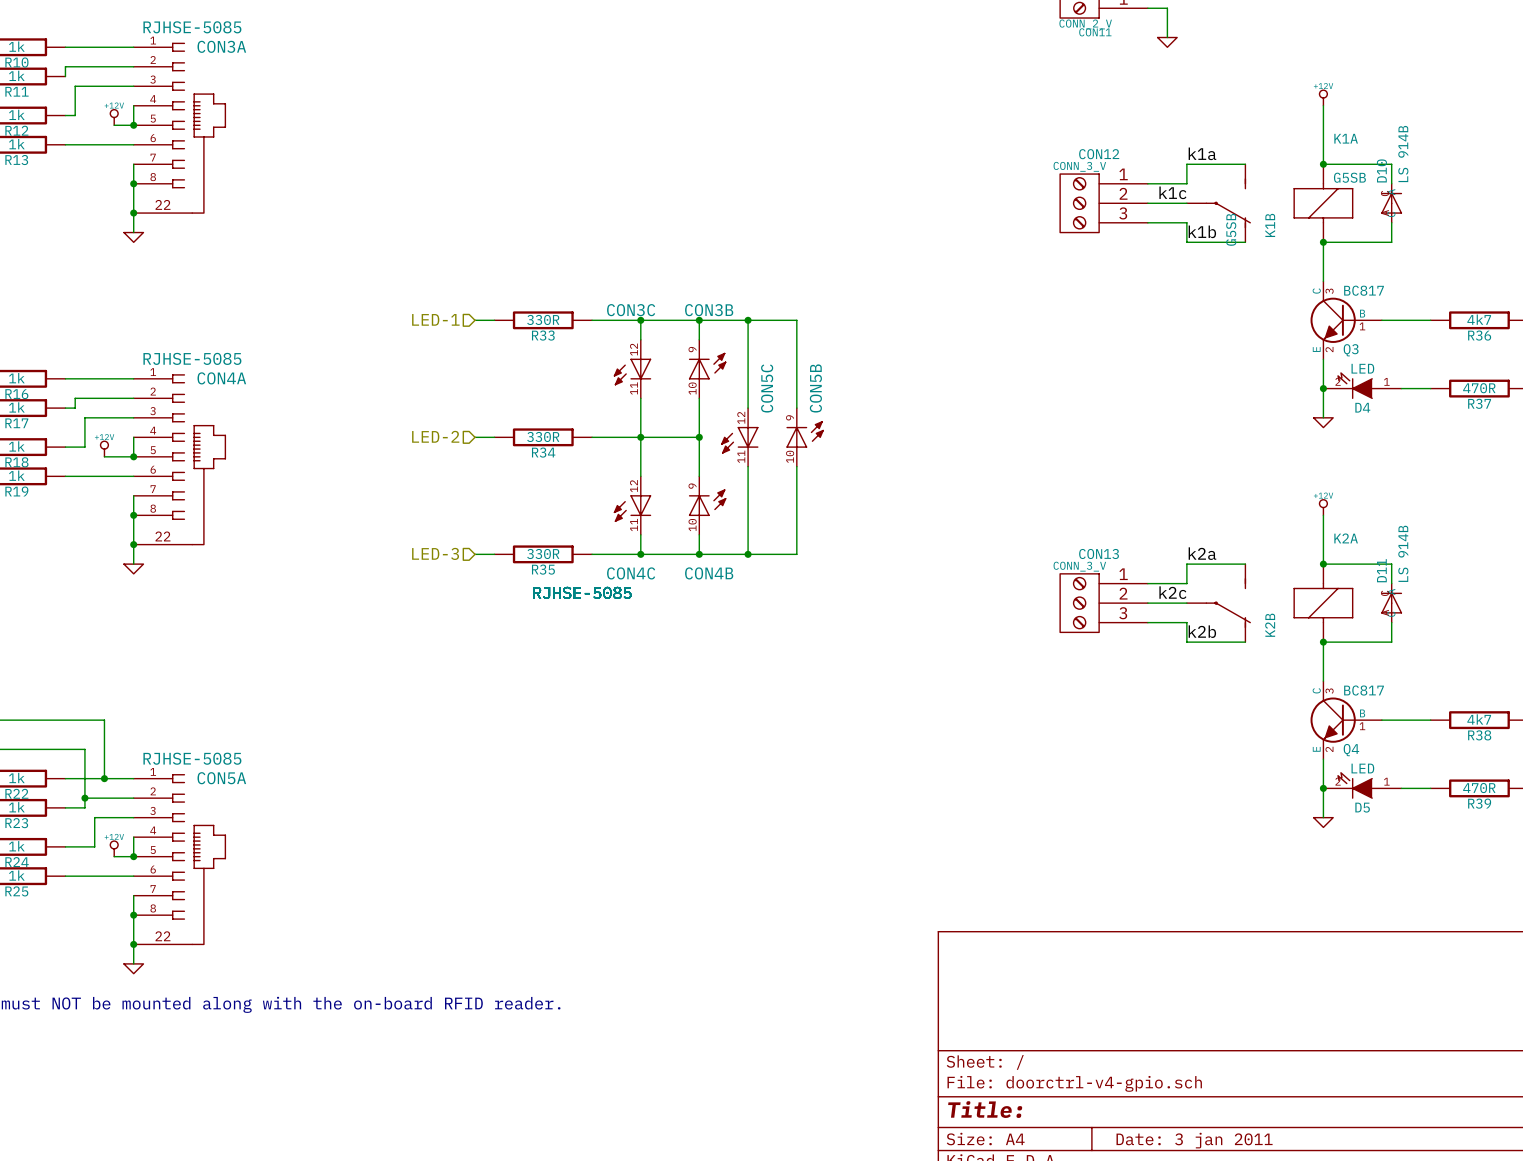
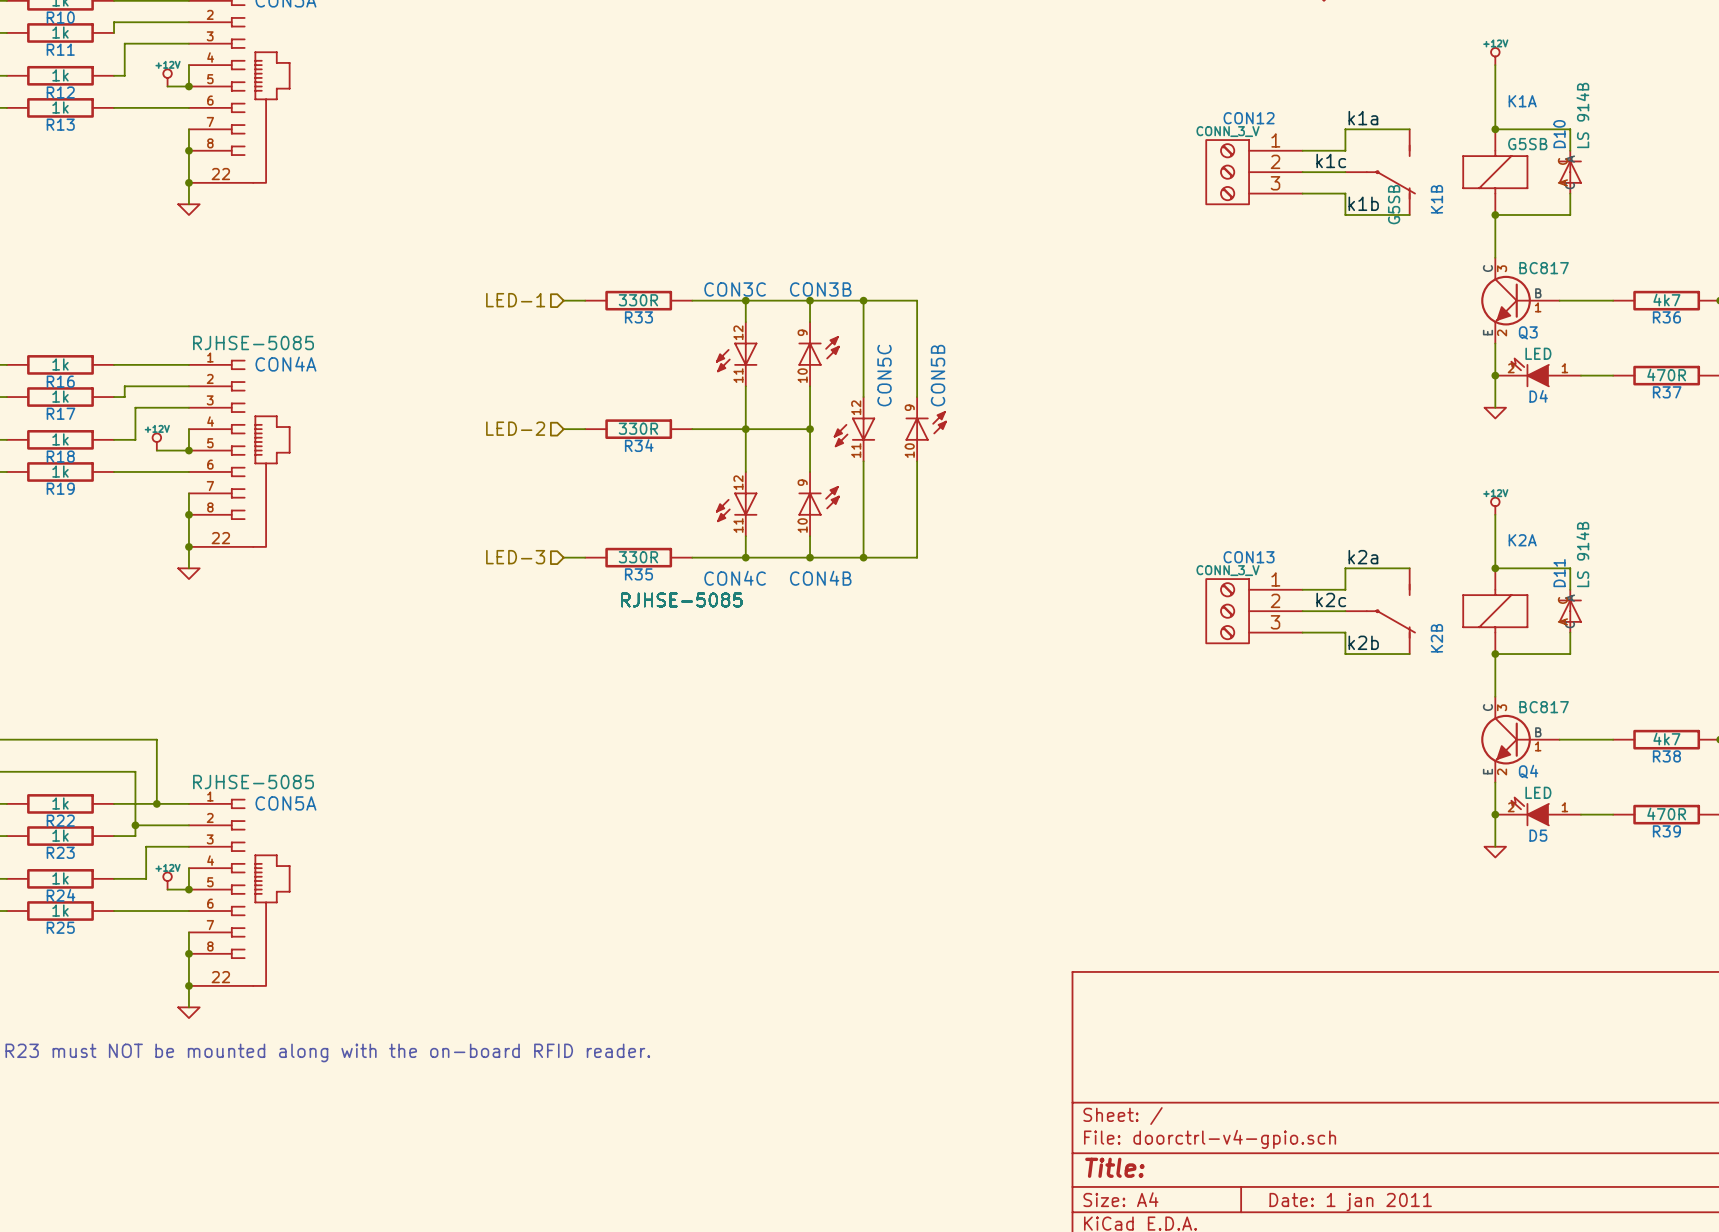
title block: Date: 3 jan 2011 (1194, 1140) -> Date: 1 jan 2011 (1350, 1202)

